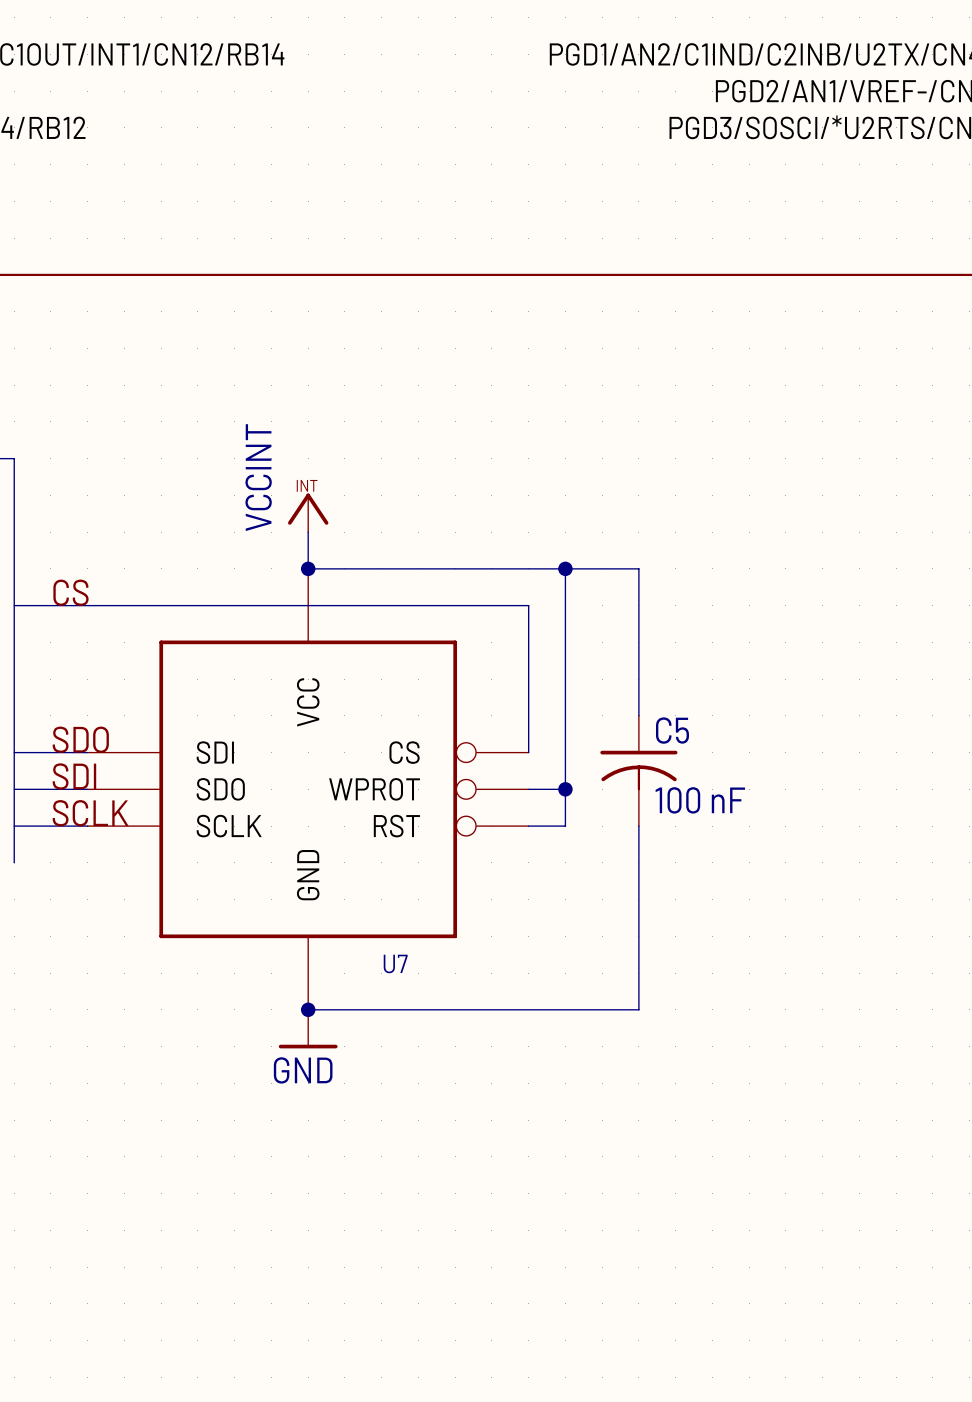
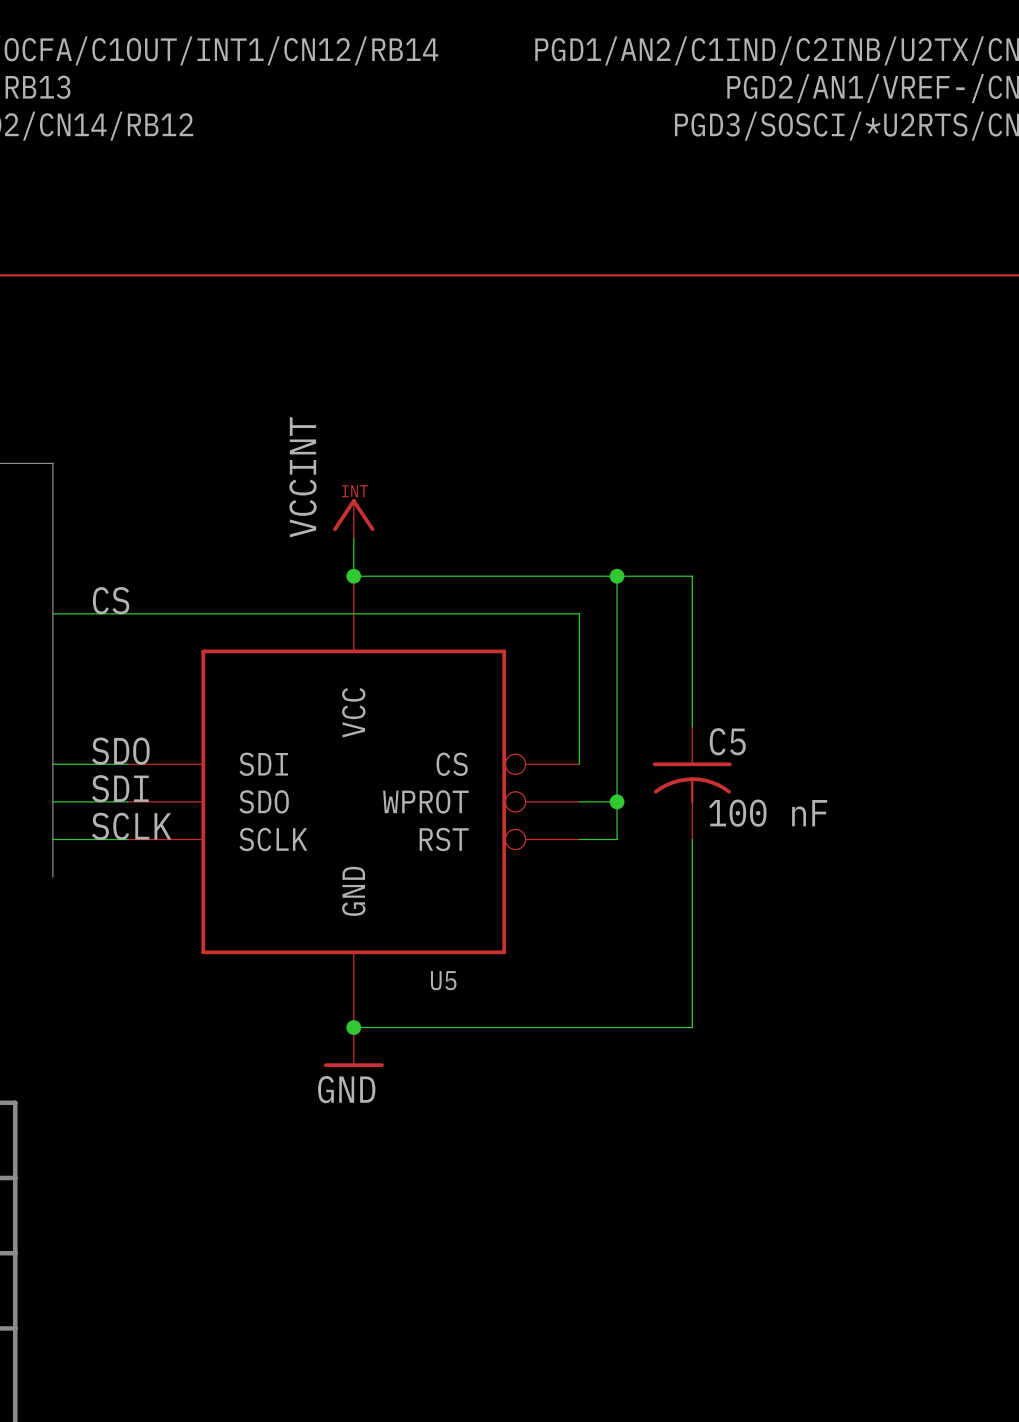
U7 name: U7 (395, 963) -> U5 (443, 980)

